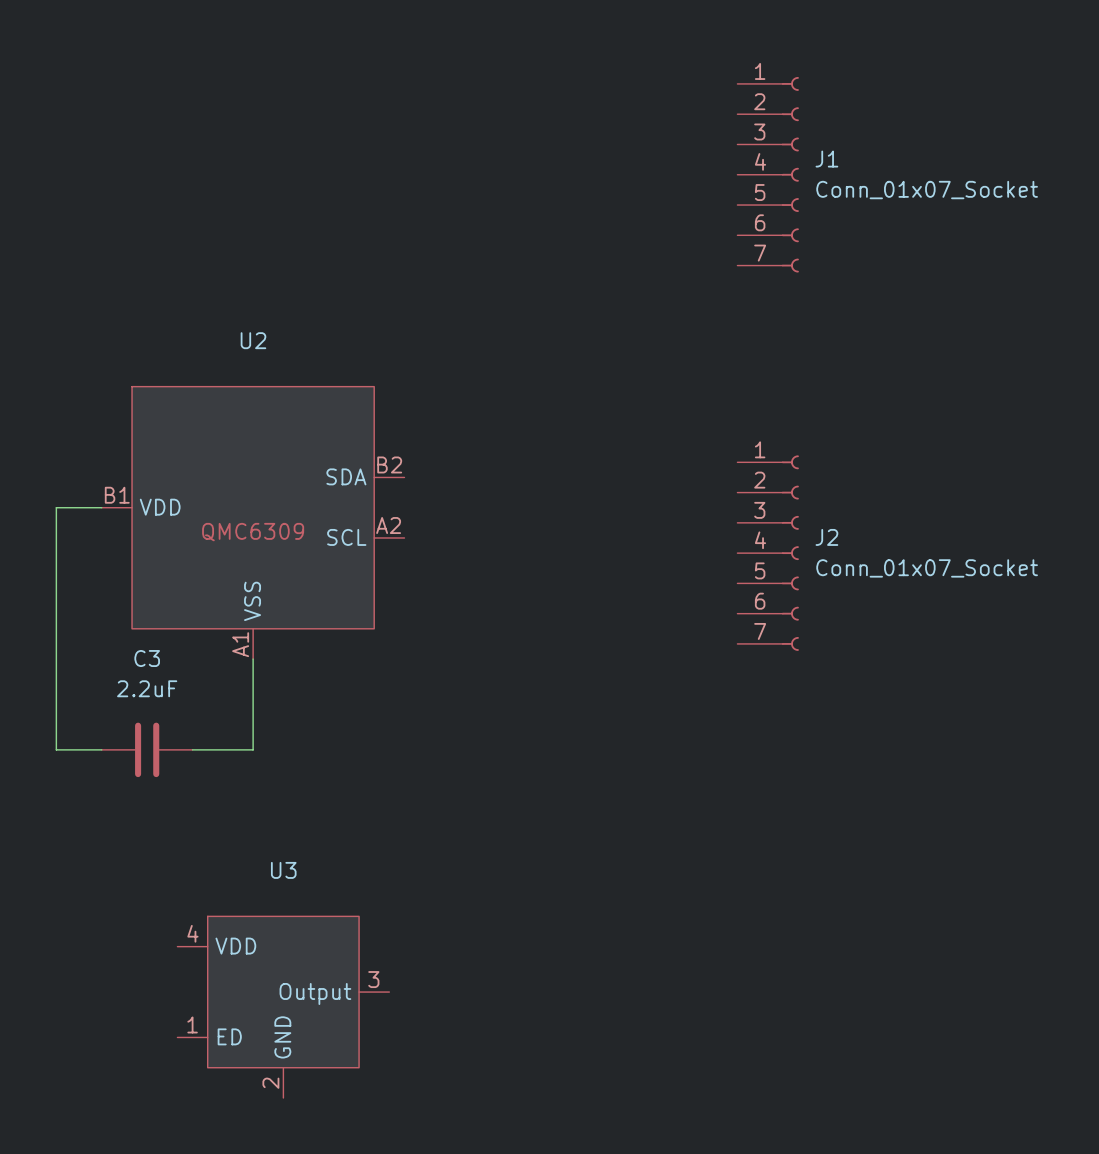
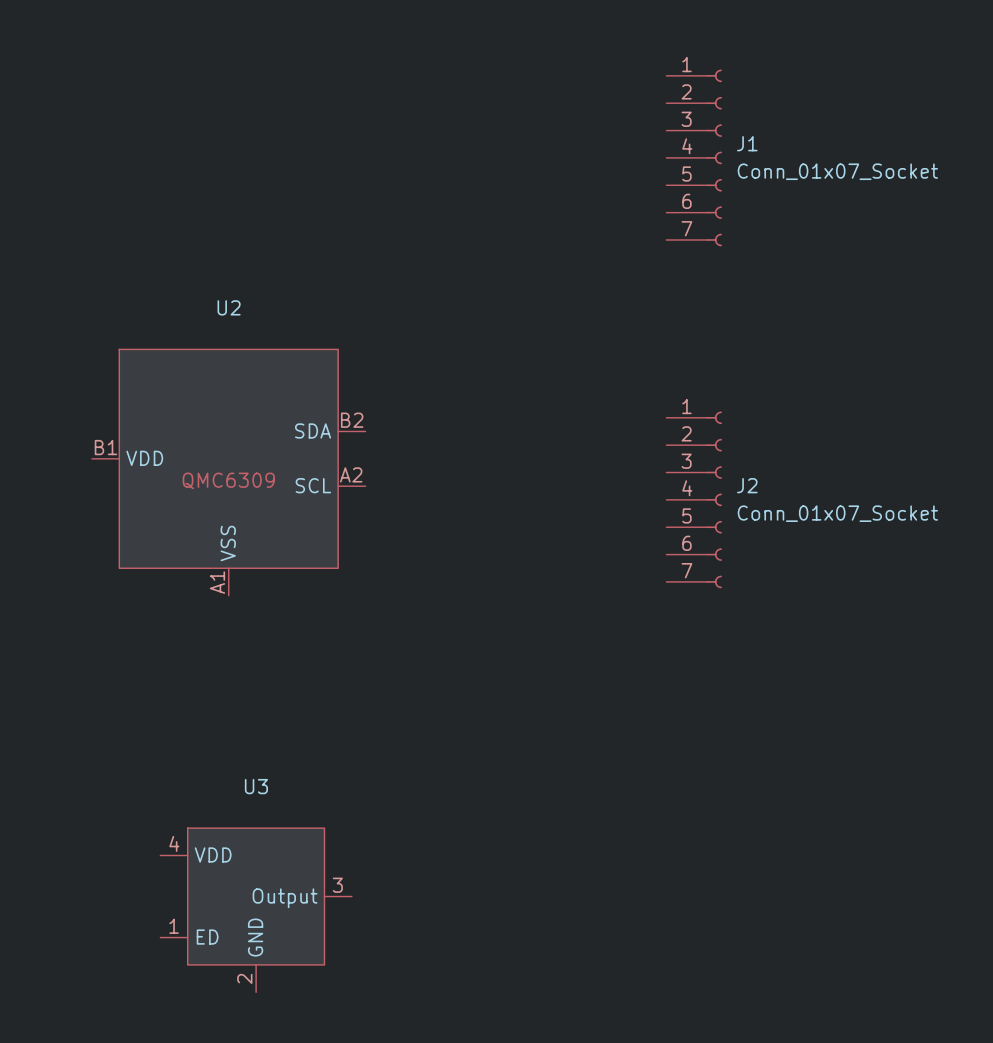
wire: (101, 507) (56, 507) (56, 749) (101, 749) -> none
wire: (253, 659) (253, 749) (192, 749) -> none
C3: 2.2uF (147, 749) -> none

